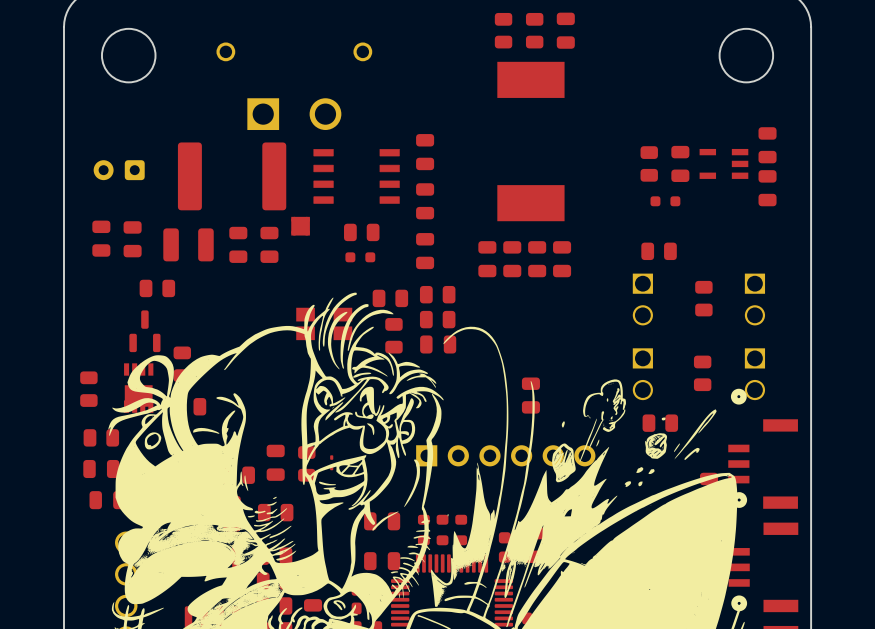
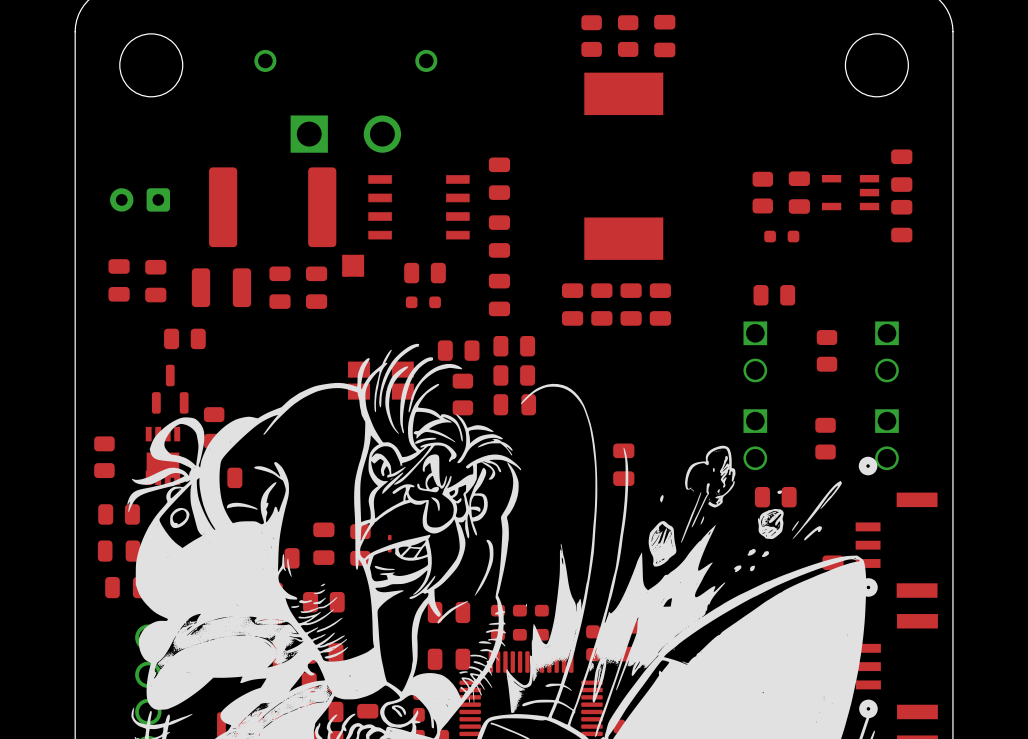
part: (505, 455) -> none

